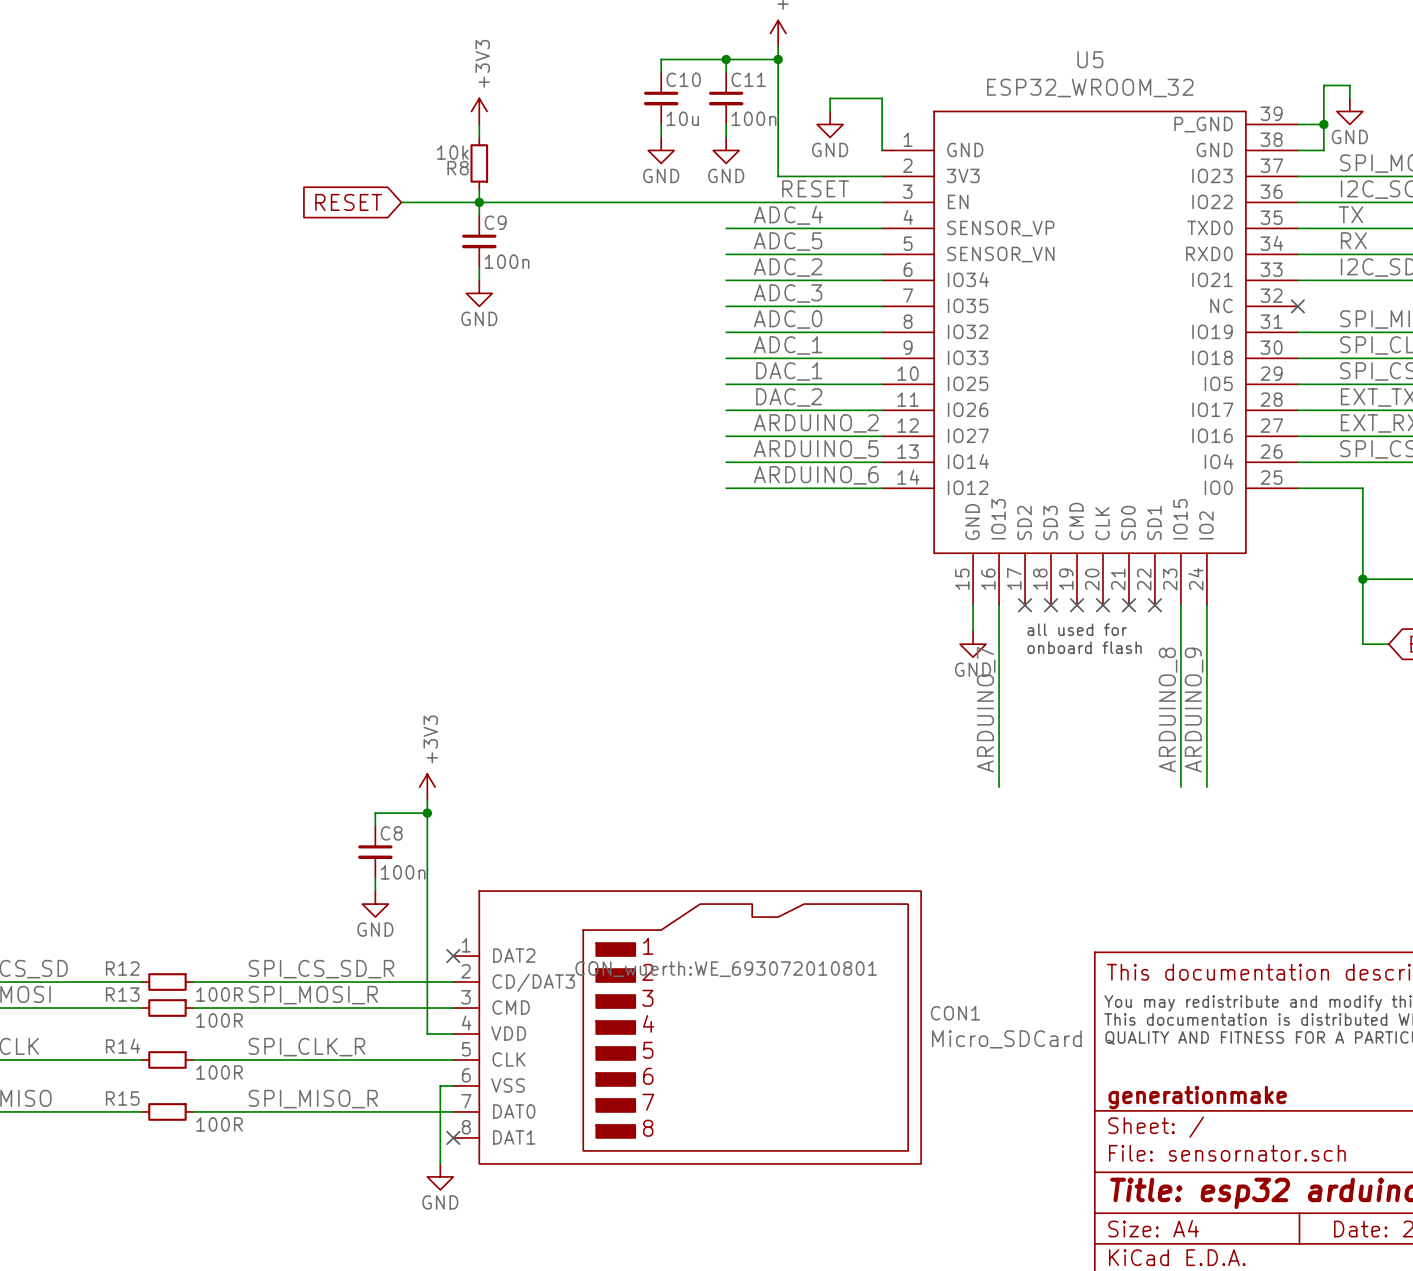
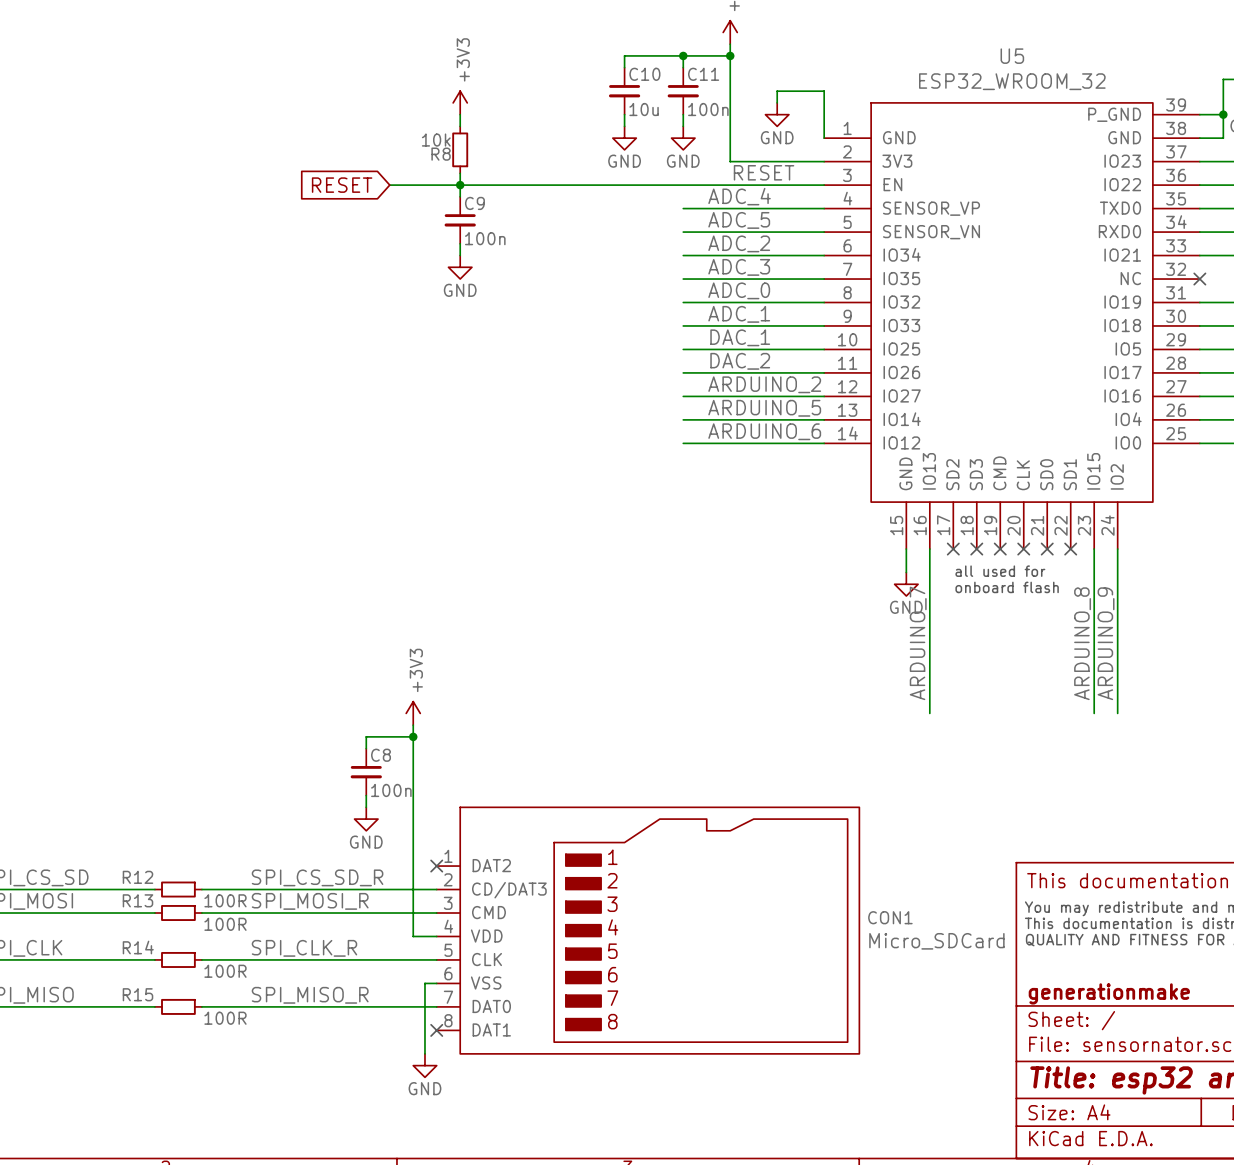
CON1 text: CON_wuerth:WE_693072010801 (726, 969) -> none

